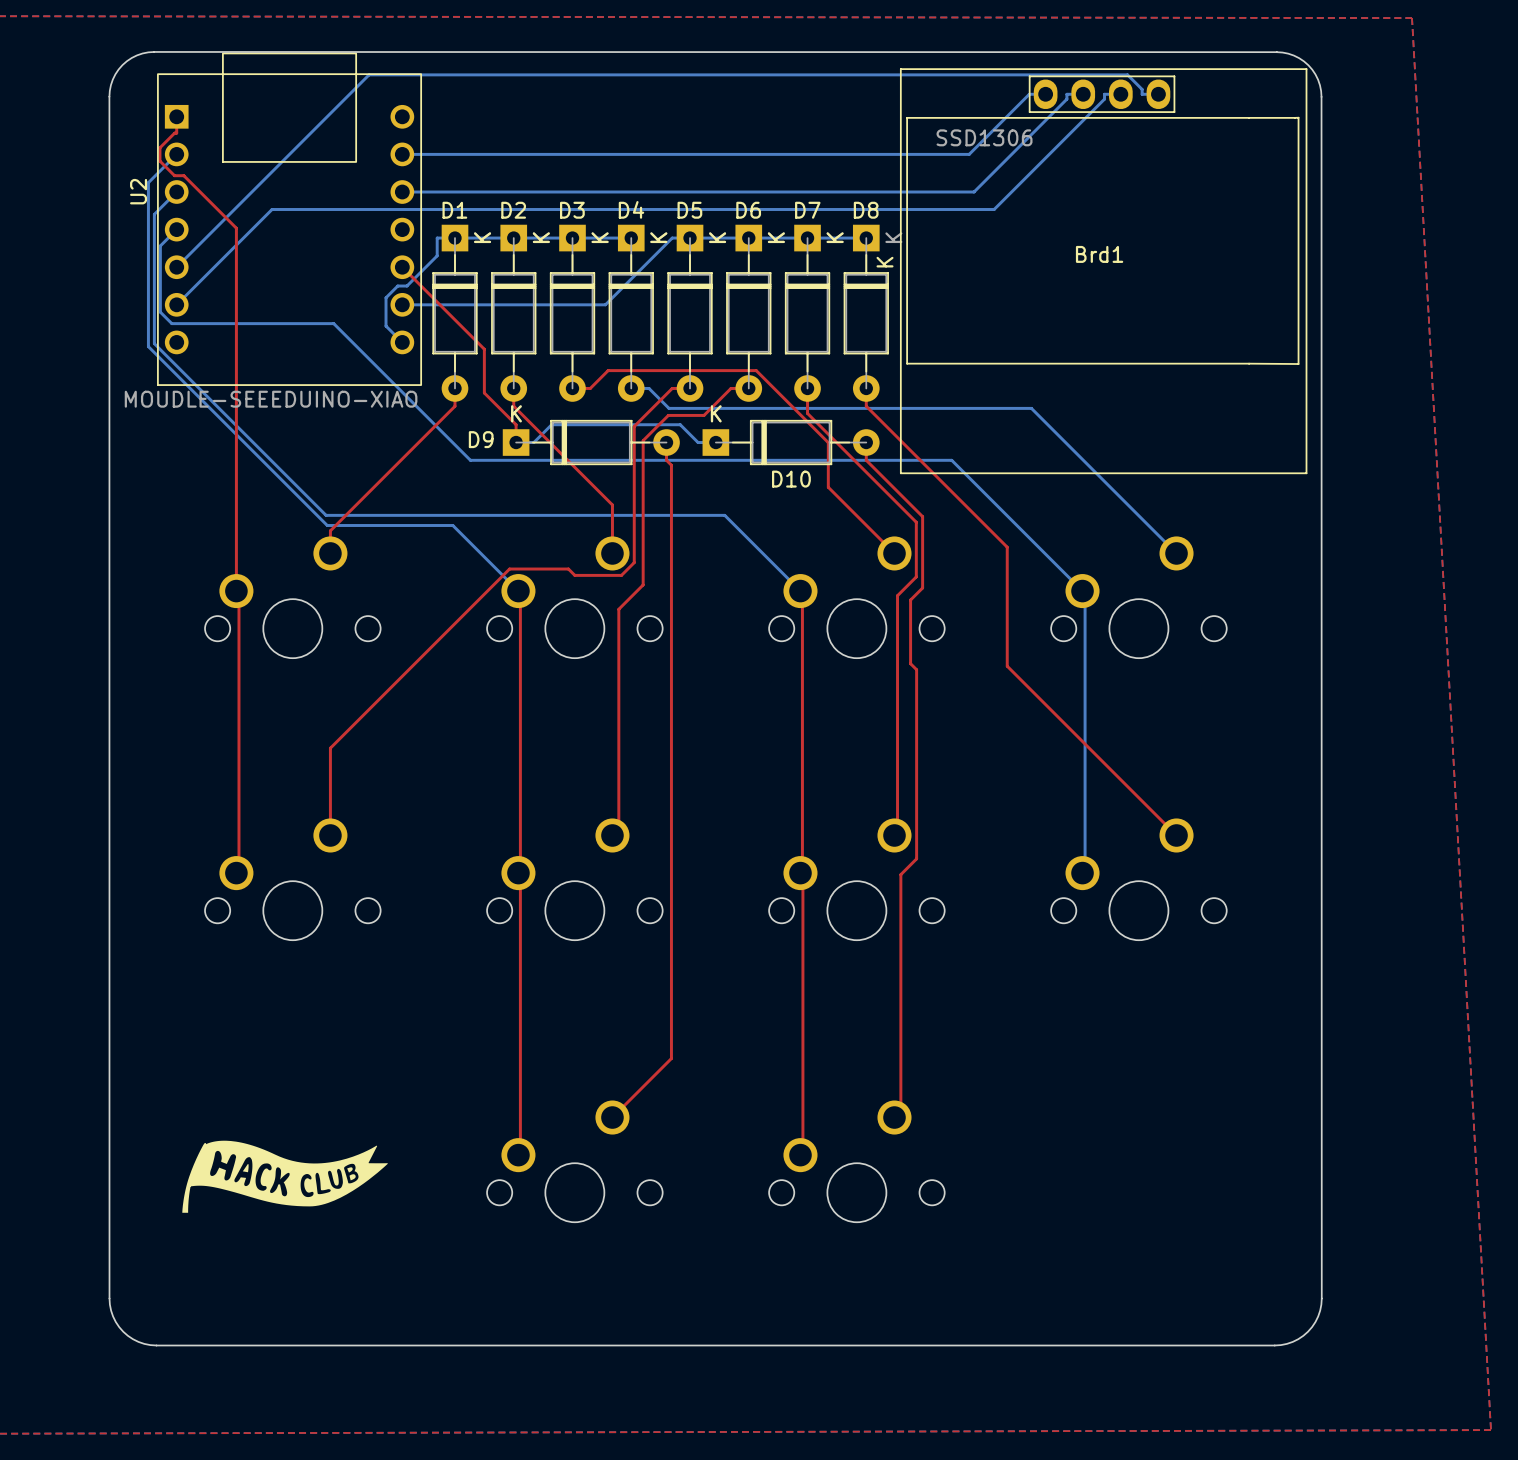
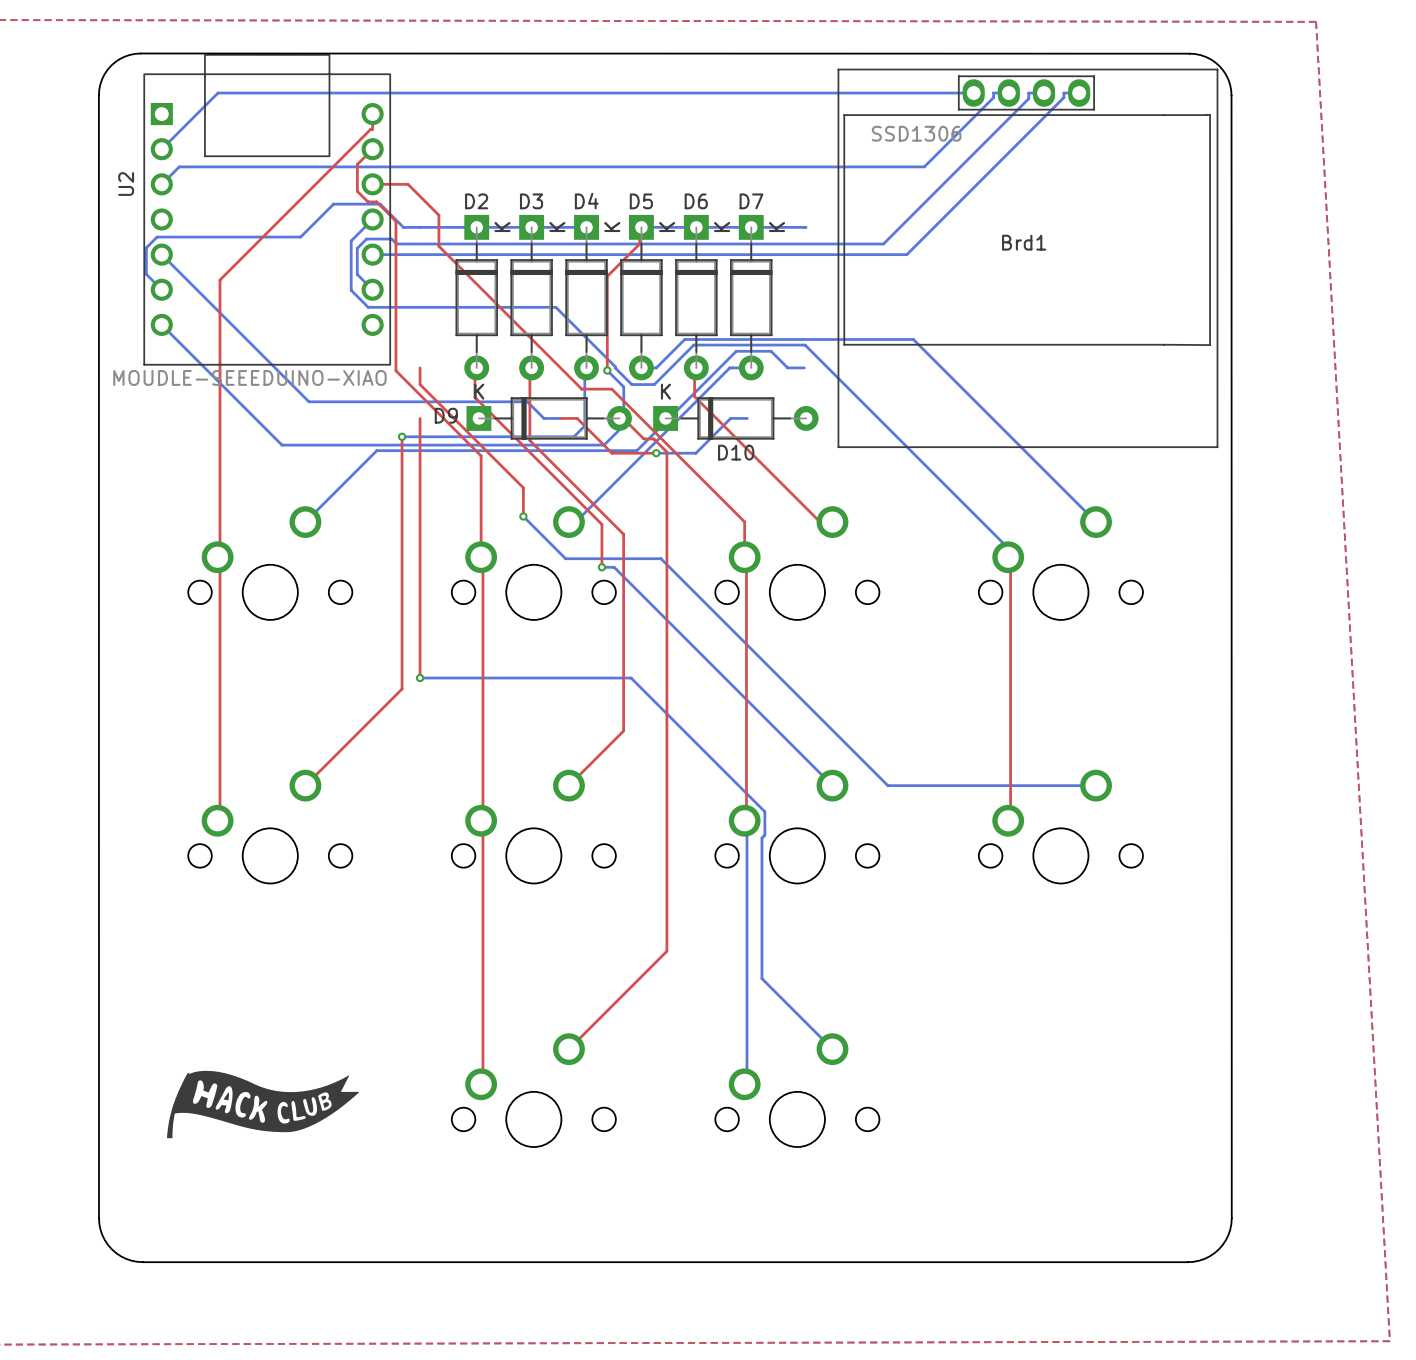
bottom track: (1029, 94) (969, 154) (402, 154) -> (958, 93) (217, 93) (161, 149)
bottom track: (1142, 94) (1142, 89) (1127, 74) (369, 74) (176, 267) -> (1063, 93) (1063, 97) (906, 254) (372, 254)
bottom track: (1104, 99) (994, 209) (272, 209) (176, 304) -> (1028, 97) (883, 243) (396, 243) (391, 239) (366, 239) (357, 248) (357, 274) (372, 289)
top track: (176, 116) (176, 133) (159, 147) (159, 161) (174, 175) (183, 175) (236, 228) (236, 591) (238, 593) -> (372, 114) (372, 129) (219, 280) (219, 559)
bottom track: (176, 154) (148, 182) (148, 346) (327, 525) (452, 525) (518, 591) -> none
top track: none -> (372, 149) (357, 164) (357, 191) (367, 201) (376, 201) (395, 221) (395, 370) (481, 455) (481, 557)
bottom track: (992, 173) (974, 192) (402, 192) -> (924, 166) (179, 166) (161, 184)
bottom track: (176, 192) (154, 214) (154, 343) (326, 515) (724, 515) (800, 591) -> none
top track: none -> (372, 184) (408, 184) (438, 215) (438, 246) (581, 389) (611, 389) (744, 521) (744, 557)
bottom track: (176, 229) (160, 245) (160, 312) (171, 323) (333, 323) (470, 460) (951, 460) (1085, 593) (1085, 870) (1082, 873) -> none
bottom track: none -> (372, 219) (351, 240) (351, 290) (368, 307) (555, 307) (631, 384) (654, 384) (693, 345) (805, 345) (1008, 548) (1008, 557)
bottom track: (437, 238) (437, 255) (407, 286) (397, 286) (386, 297) (386, 326) (402, 342) -> (405, 227) (380, 204) (333, 204) (300, 237) (157, 237) (146, 247) (146, 274) (161, 289)
bottom track: (688, 238) (672, 238) (605, 304) (402, 304) -> none
top track: none -> (639, 227) (639, 243) (607, 276) (607, 370)
top track: (402, 267) (484, 349) (484, 393) (516, 424) (516, 442) -> none
D1: (454, 313) -> none
D8: (866, 313) -> none
bottom track: none -> (161, 324) (282, 445) (604, 445) (623, 425) (623, 386) (607, 370)
top track: none -> (420, 367) (420, 384) (523, 487) (523, 516)
top track: (454, 388) (454, 406) (330, 530) (330, 553) -> none
top track: none -> (474, 367) (474, 397) (601, 524) (601, 567)
top track: (513, 388) (513, 406) (612, 504) (612, 553) -> none
top track: (572, 388) (590, 388) (608, 370) (756, 370) (828, 442) (828, 487) (894, 553) -> (694, 367) (694, 396) (820, 522) (832, 522)
bottom track: none -> (584, 367) (584, 425) (573, 436) (402, 436)
bottom track: (631, 388) (649, 388) (668, 408) (1031, 408) -> (639, 367) (656, 367) (684, 339) (913, 339) (960, 386)
top track: (690, 388) (672, 388) (634, 426) (634, 562) (621, 575) (574, 575) (568, 569) (509, 569) (330, 748) (330, 835) -> (402, 436) (402, 689) (305, 785)
top track: (748, 388) (730, 388) (704, 415) (668, 415) (643, 440) (643, 584) (618, 609) (618, 829) -> (529, 367) (529, 440) (623, 534) (623, 730) (574, 779)
bottom track: none -> (749, 367) (729, 367) (575, 522) (568, 522)
top track: (807, 388) (807, 413) (916, 522) (916, 576) (897, 595) (897, 832) (894, 835) -> none
bottom track: none -> (804, 367) (787, 367) (771, 351) (736, 351) (636, 450) (376, 450) (305, 522)
top track: (866, 388) (866, 406) (1007, 547) (1007, 666) (1176, 835) -> none
via: none -> (607, 370)
bottom track: (551, 424) (533, 442) (516, 442) -> (512, 401) (308, 401) (161, 254)
bottom track: (567, 424) (680, 424) (698, 442) (715, 442) -> (527, 401) (544, 418) (560, 418)
top track: none -> (420, 418) (420, 678)
top track: none -> (560, 418) (577, 418) (612, 453) (656, 453)
top track: (666, 442) (666, 460) (671, 465) (671, 1058) -> (606, 418) (623, 418) (643, 438) (653, 438) (666, 452) (666, 951) (624, 994)
bottom track: none -> (747, 418) (730, 418) (695, 453) (656, 453)
top track: (866, 442) (866, 460) (922, 516) (922, 587) (910, 600) (910, 663) (916, 669) (916, 858) (900, 874) (900, 1111) (894, 1117) -> none
via: none -> (402, 436)
via: none -> (656, 453)
bottom track: none -> (523, 516) (565, 558) (660, 558) (887, 785) (1096, 785)
via: none -> (523, 516)
top track: none -> (1008, 557) (1010, 559) (1010, 818) (1008, 820)
bottom track: none -> (601, 567) (614, 567) (832, 785)
via: none -> (601, 567)
bottom track: none -> (420, 678) (631, 678) (764, 811) (764, 835) (761, 838) (761, 978) (832, 1049)
via: none -> (420, 678)
bottom track: none -> (744, 820) (747, 823) (747, 1081) (744, 1084)
top track: (800, 873) (802, 875) (802, 1152) (800, 1155) -> none

